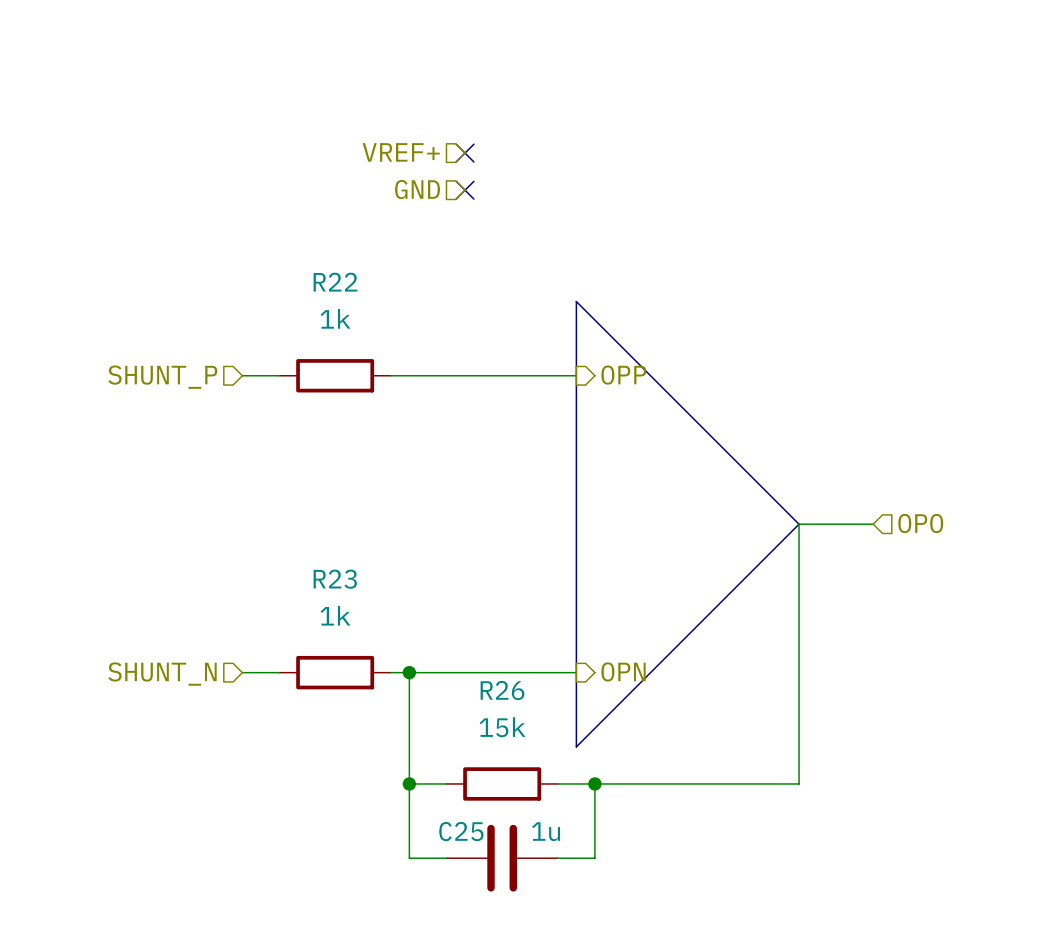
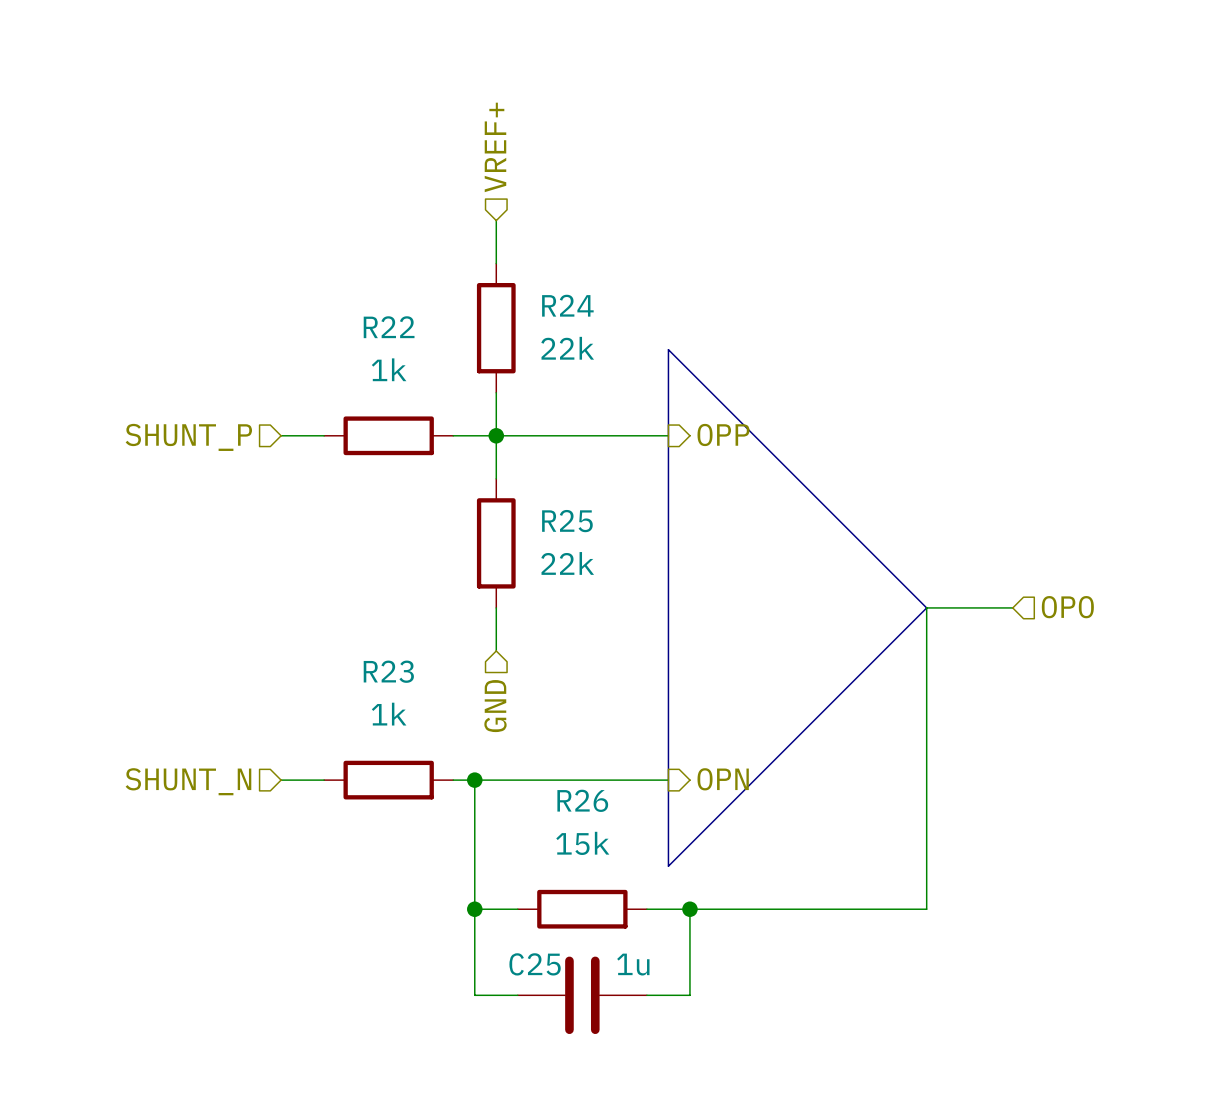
hierarchical label rotation: 0° (401, 152) -> 90° clockwise (495, 147)
no-connect mark: (465, 153) -> none
hierarchical label: GND (417, 189) -> none
wire: none -> (496, 220) (496, 263)
no-connect mark: (465, 190) -> none
R24: none -> 22k (496, 328)
wire: none -> (496, 392) (496, 478)
junction: none -> (496, 435)
R25: none -> 22k (496, 543)
wire: none -> (496, 607) (496, 650)
hierarchical label: none -> GND (495, 706)

